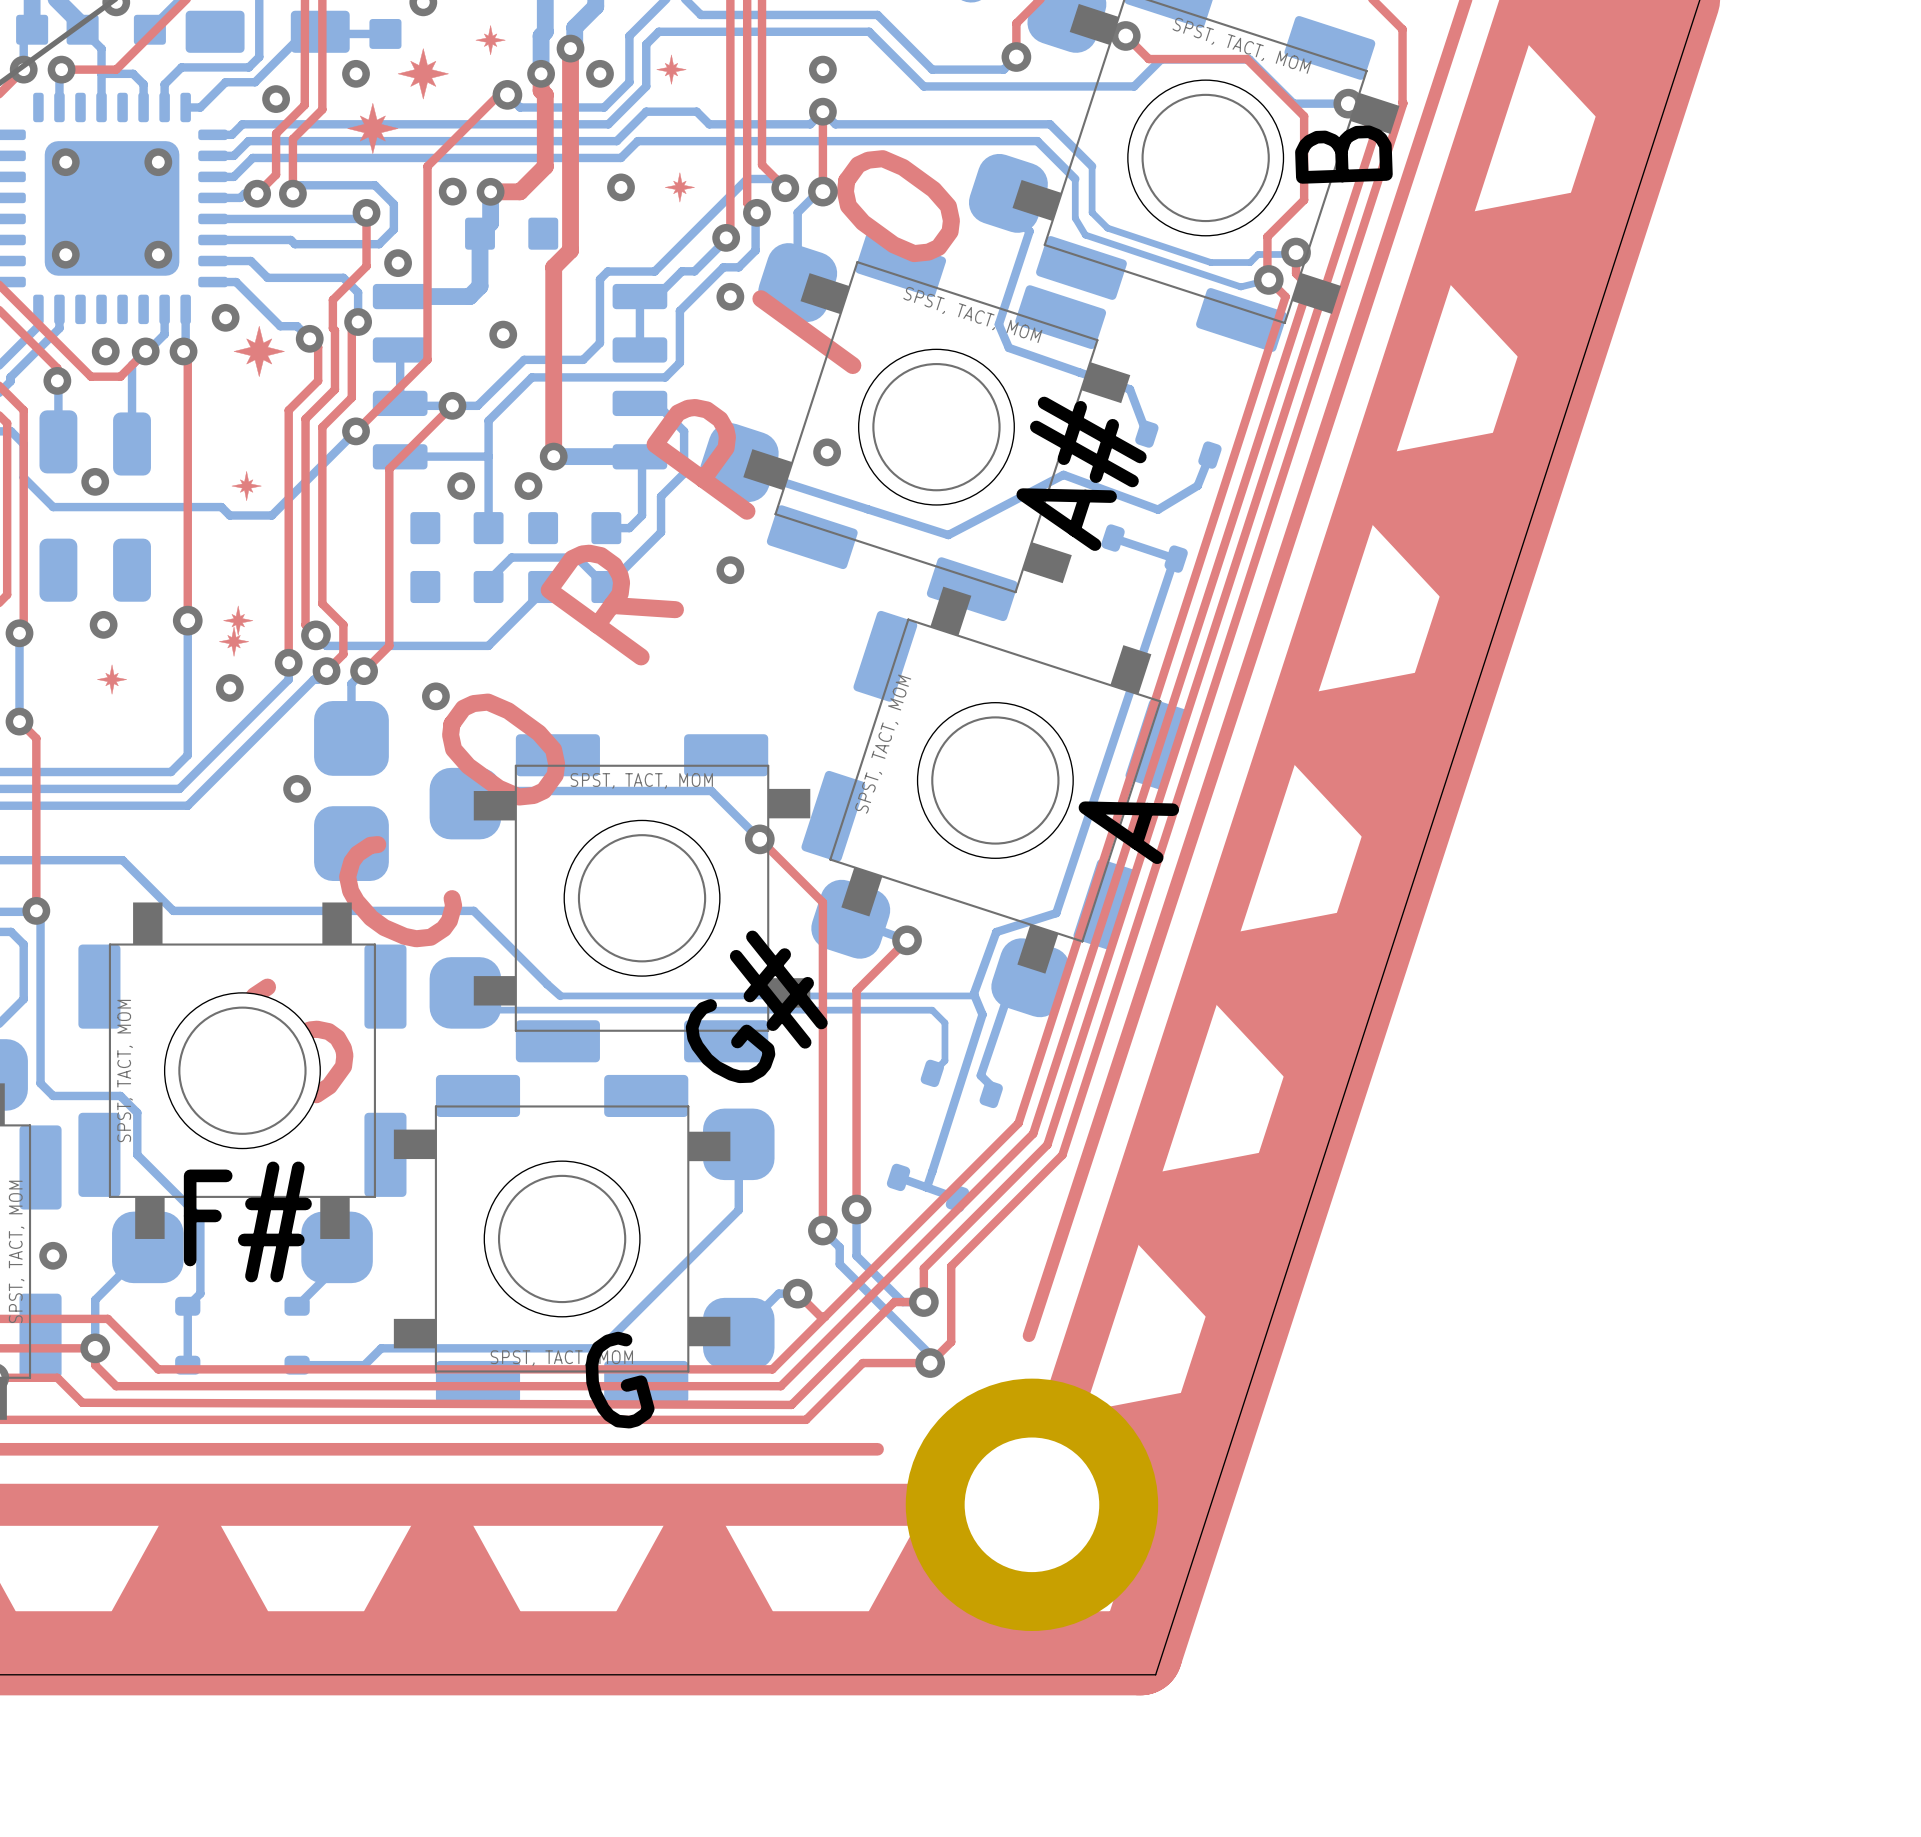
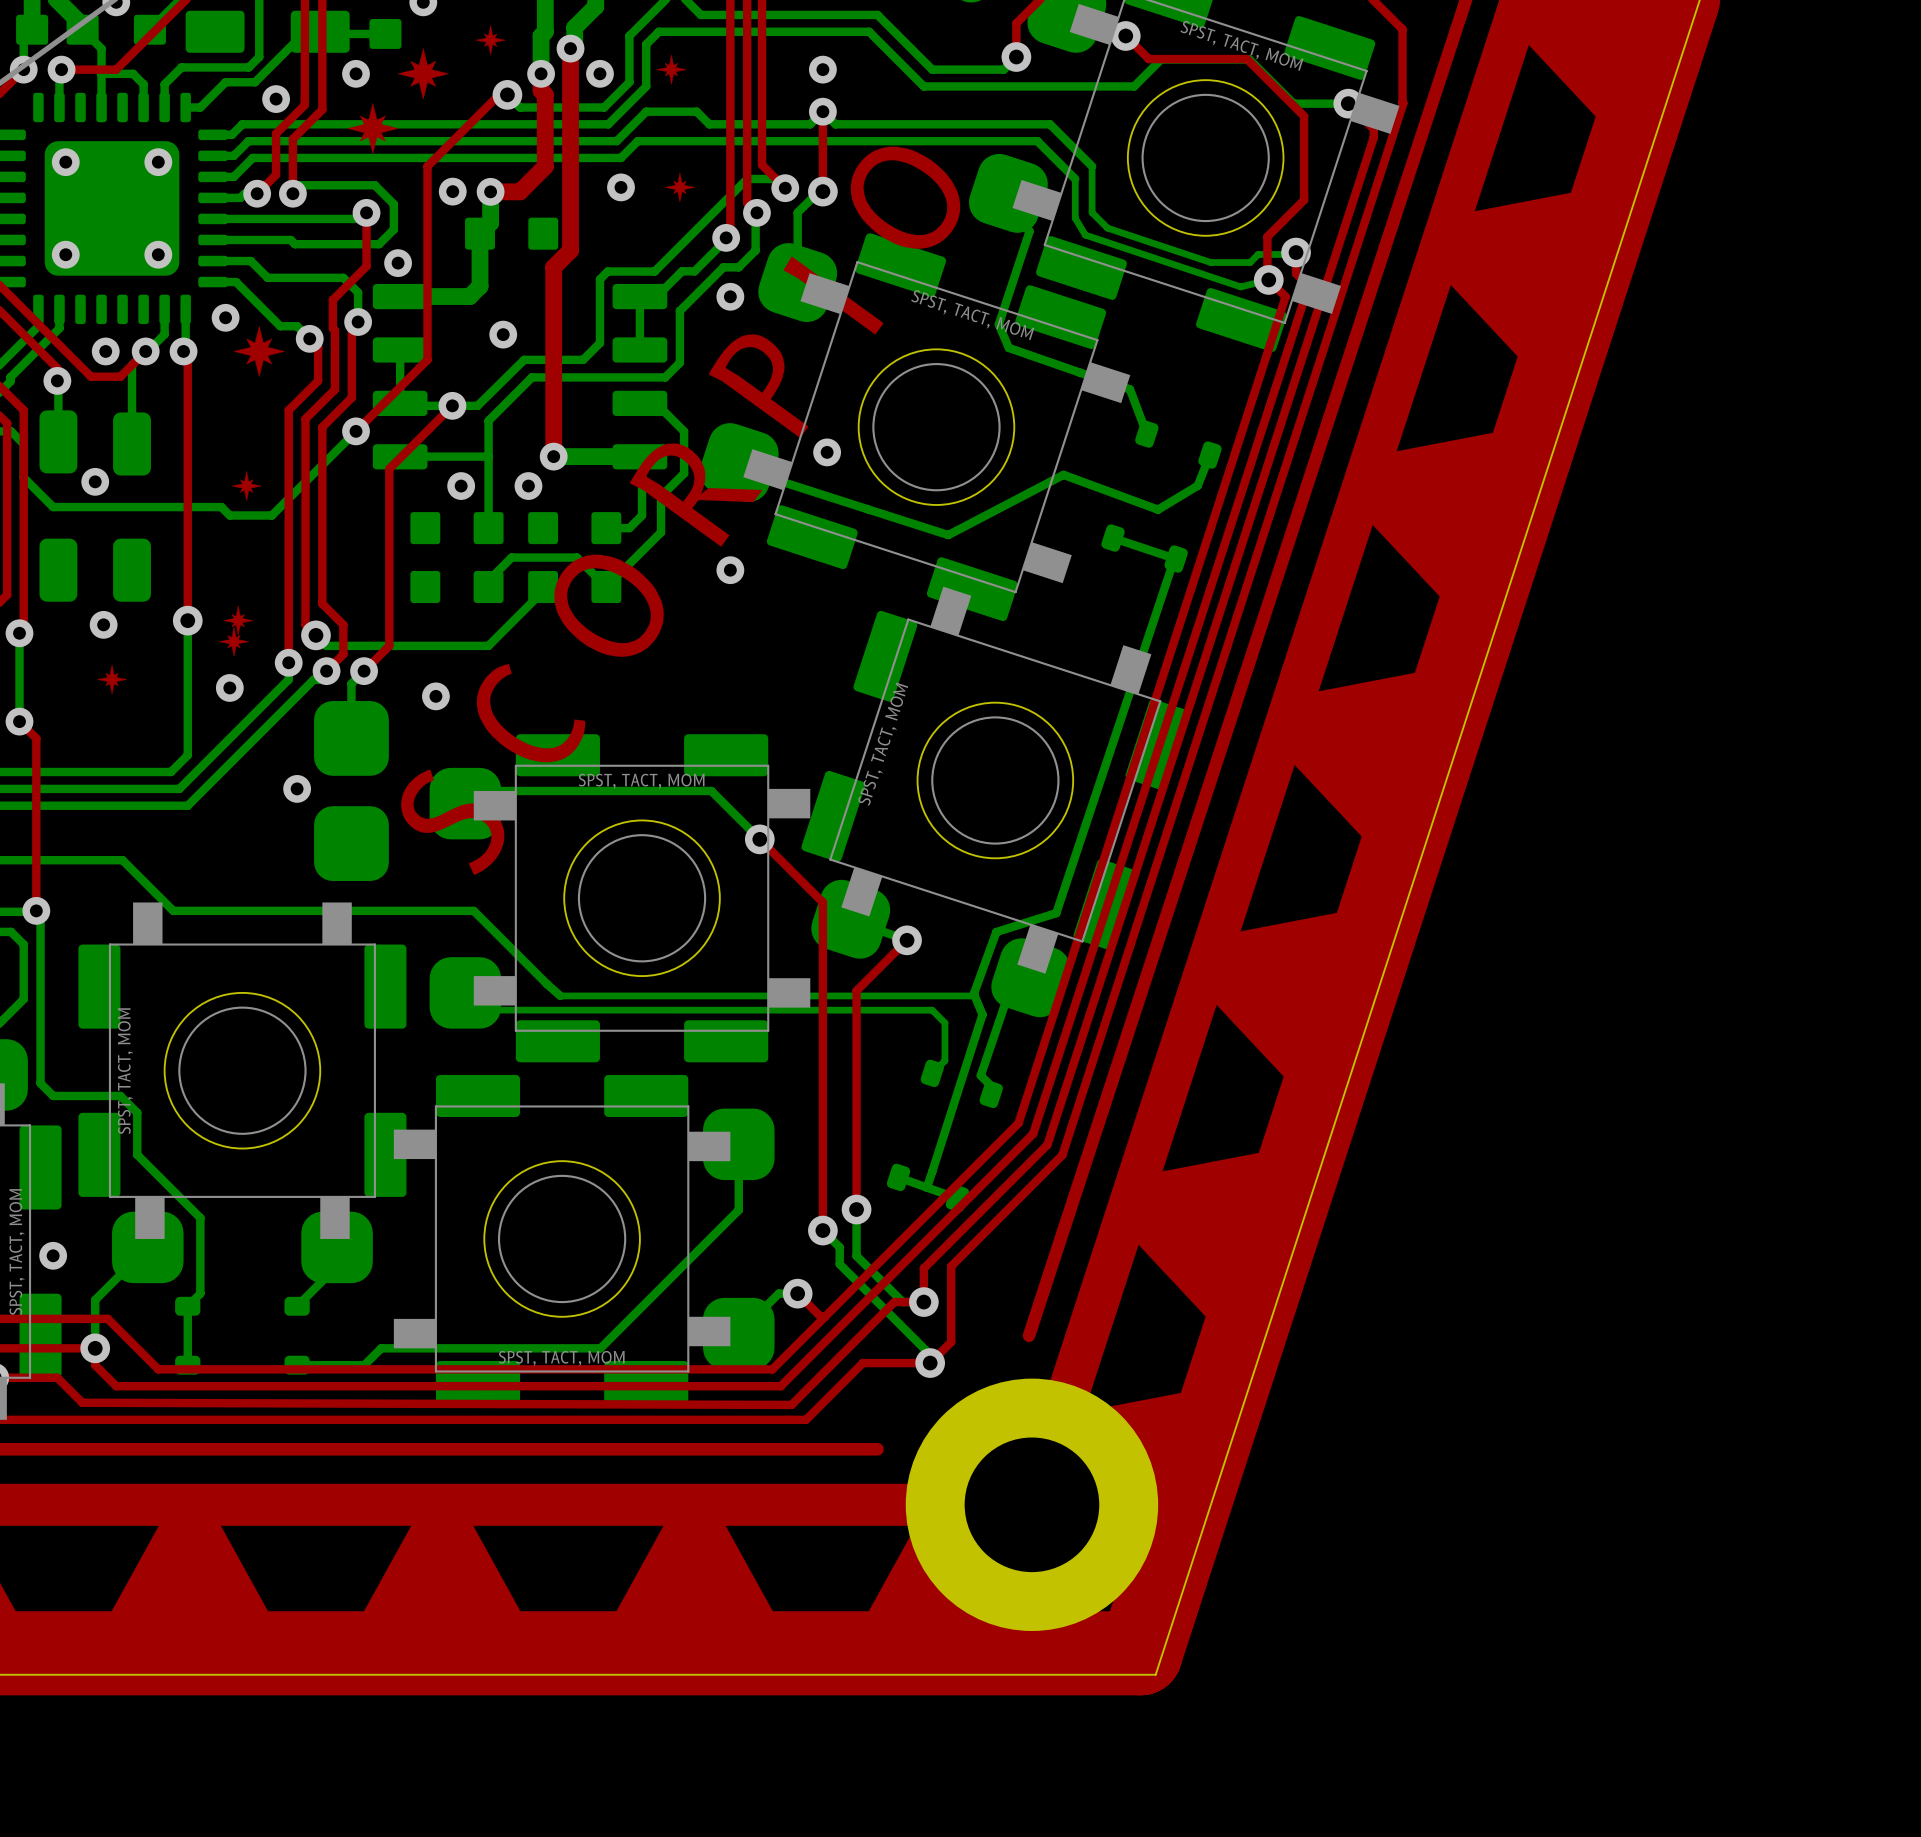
B name: B (1343, 154) -> none
A# name: A# (1081, 473) -> none
A name: A (1128, 832) -> none
G# name: G# (756, 1006) -> none
F# name: F# (247, 1221) -> none
G name: G (620, 1380) -> none

